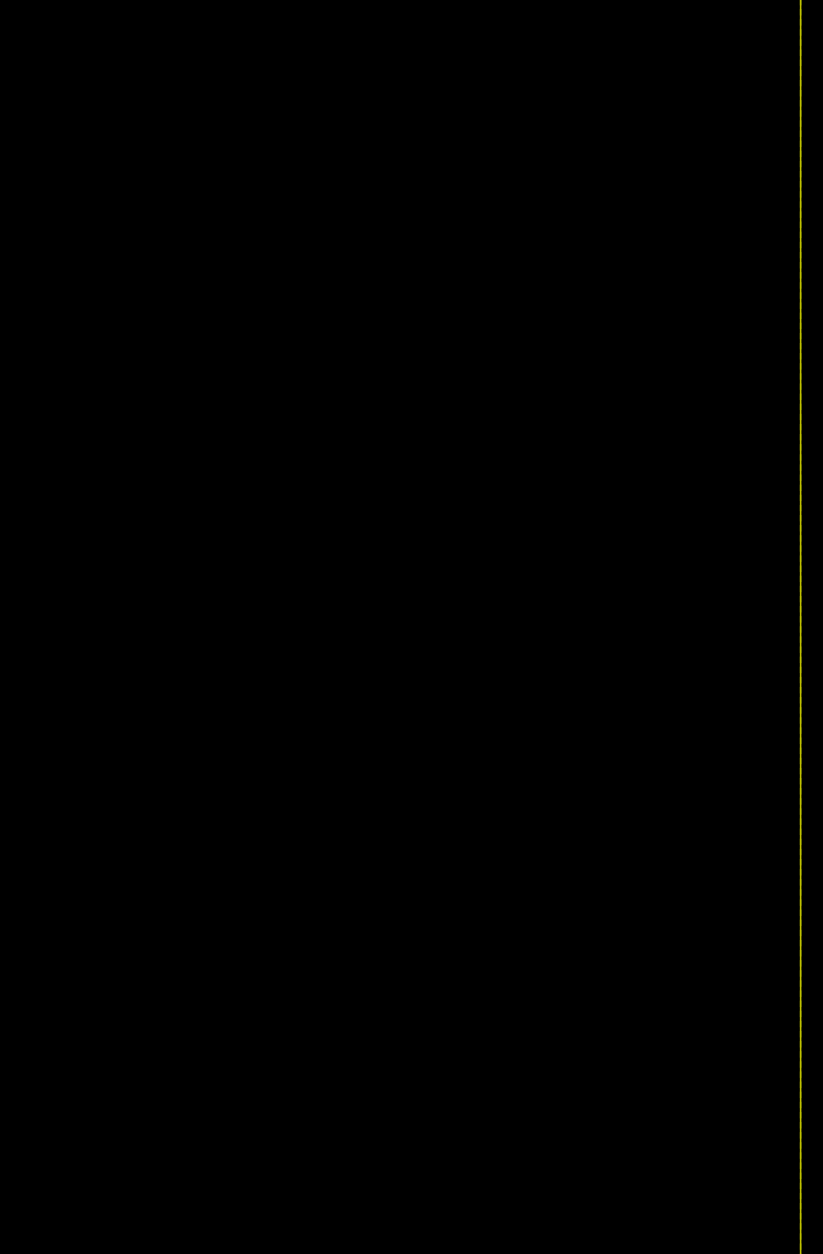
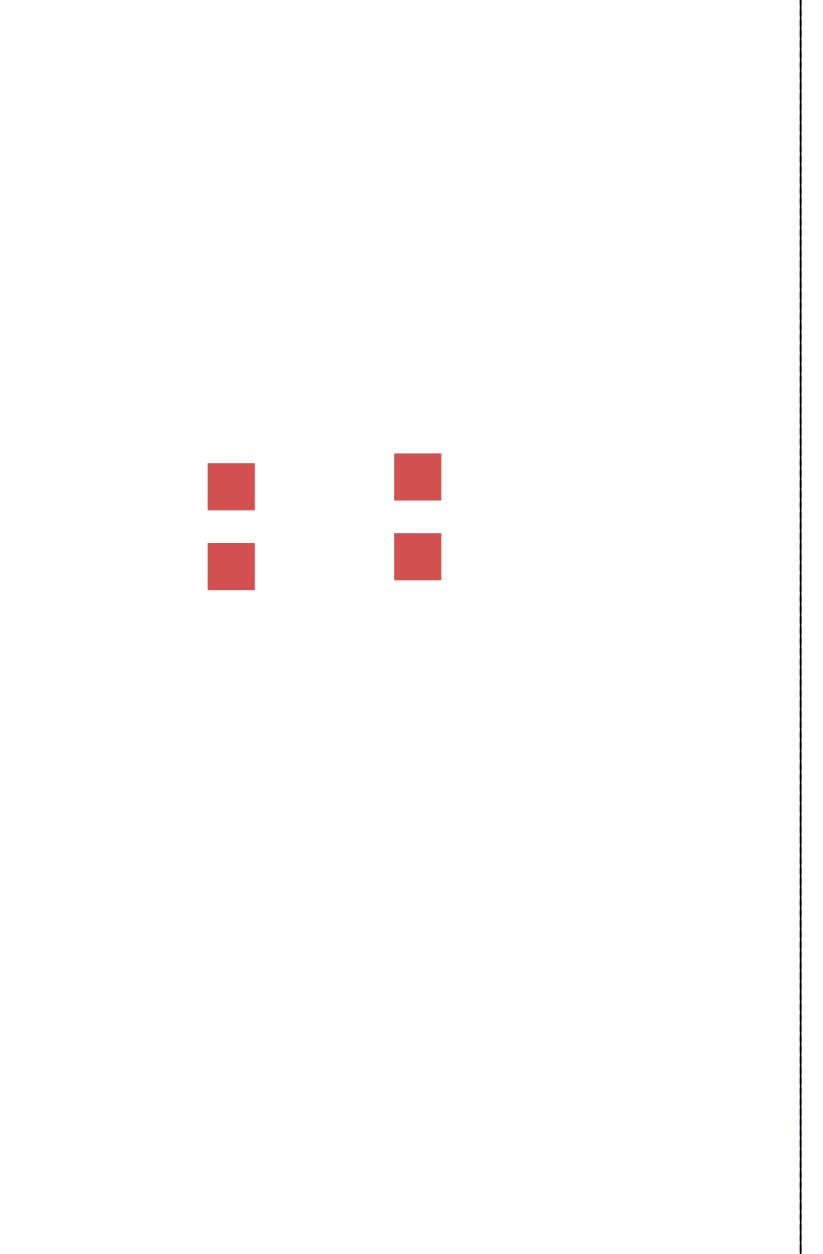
part: none -> (417, 516)
part: none -> (231, 526)

